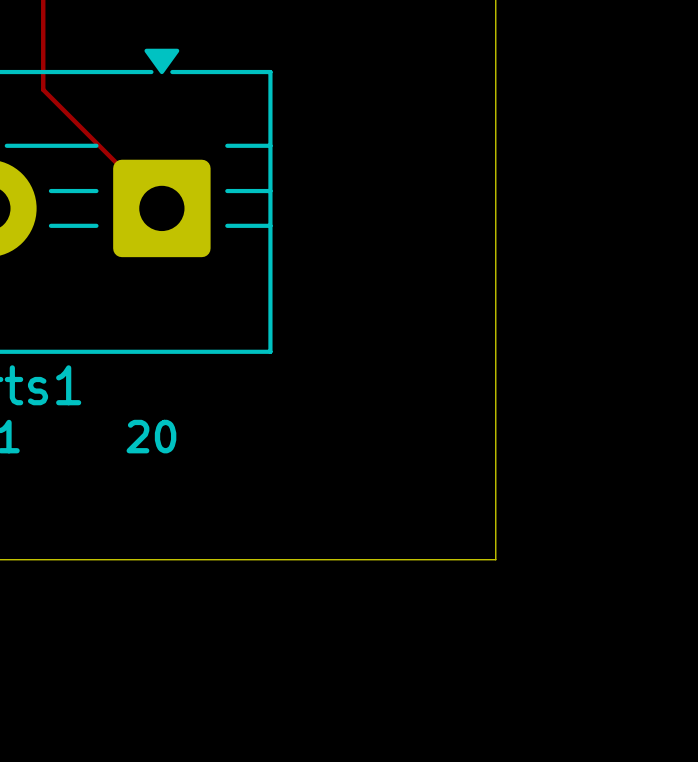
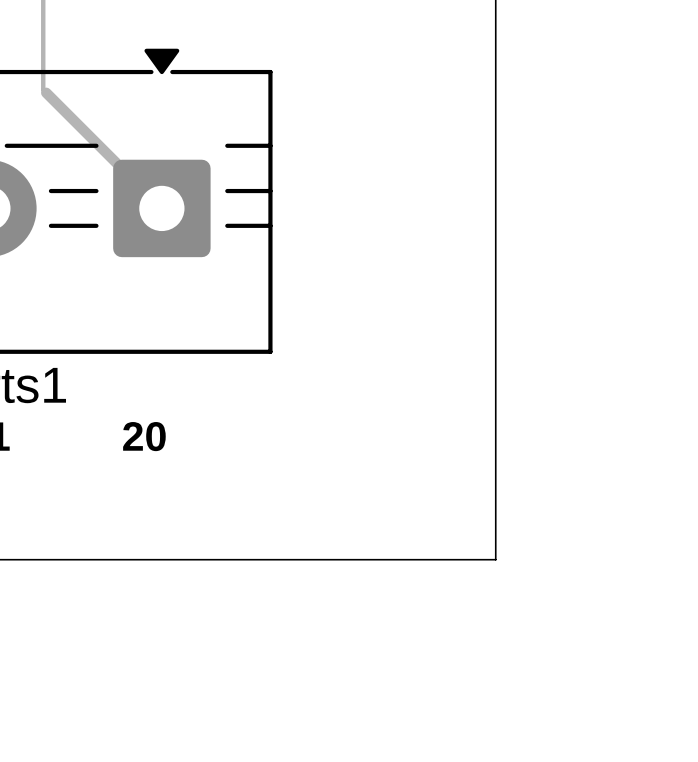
track width: thin (46, 92) (161, 208) -> thick (46, 92) (161, 208)

